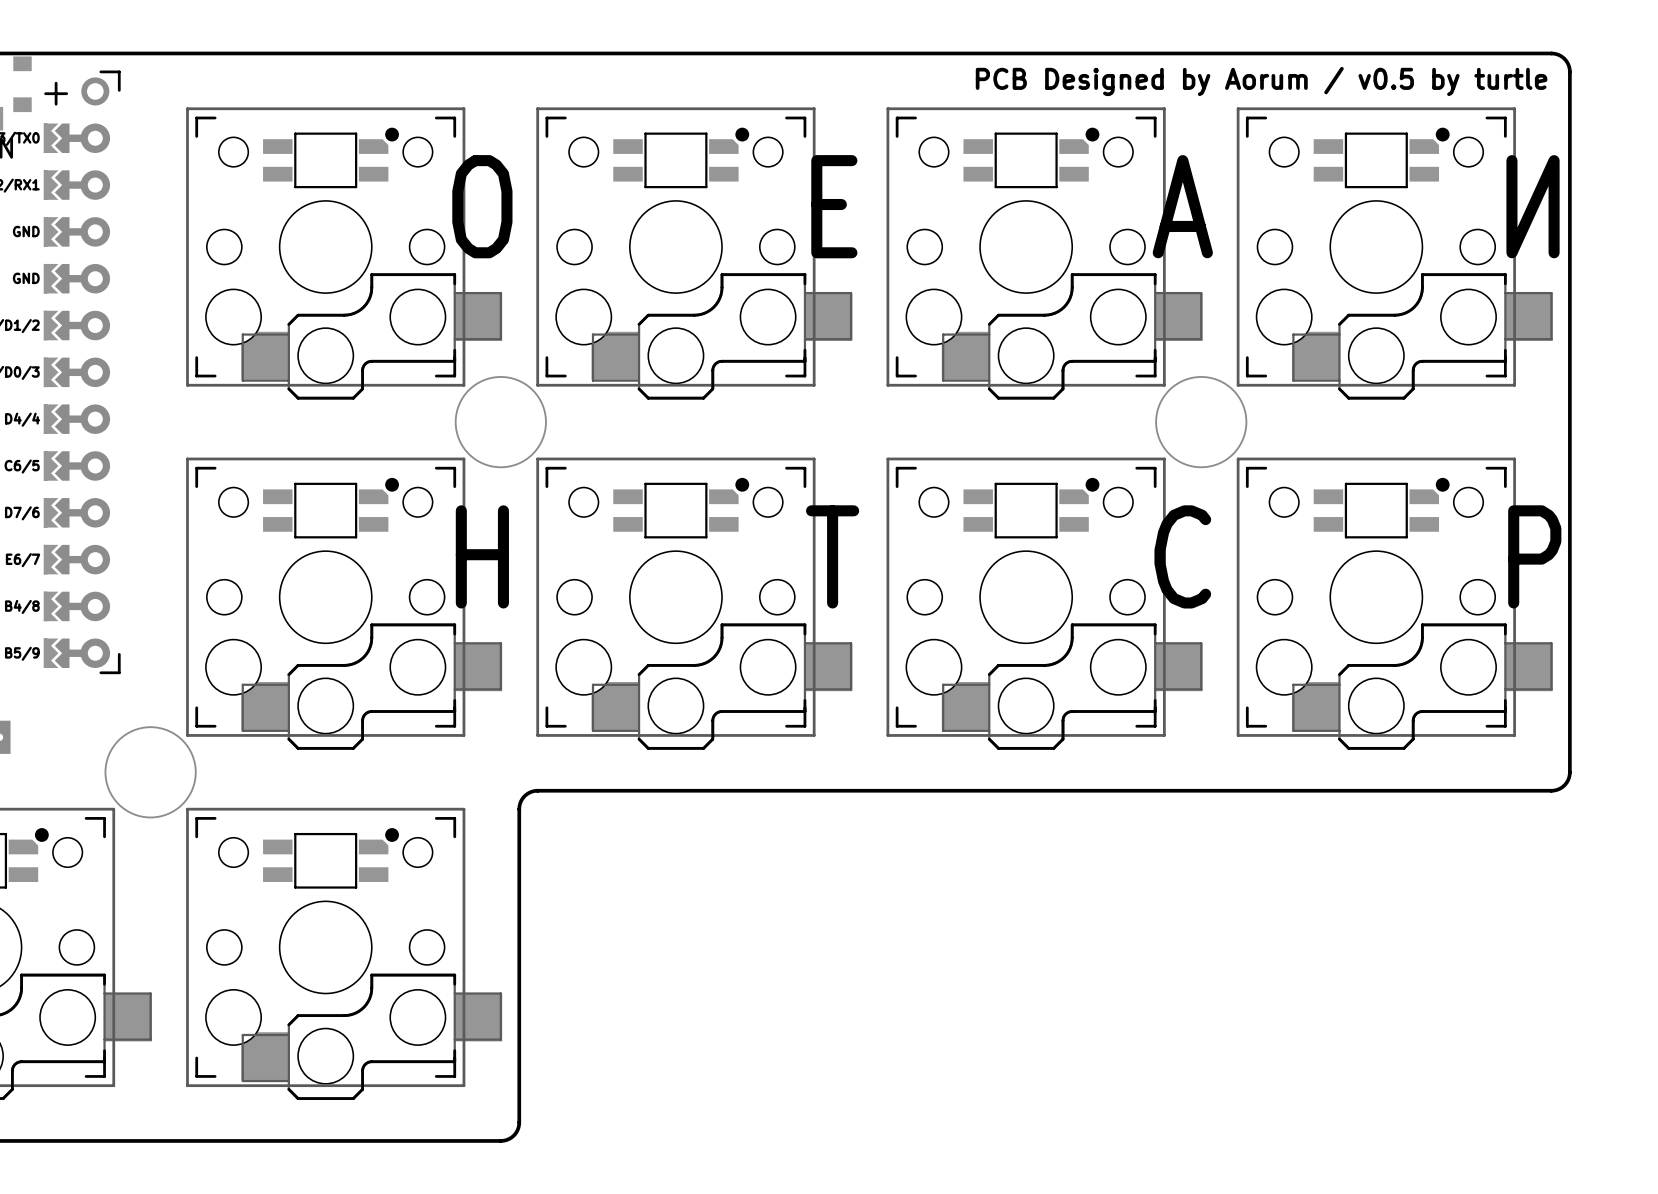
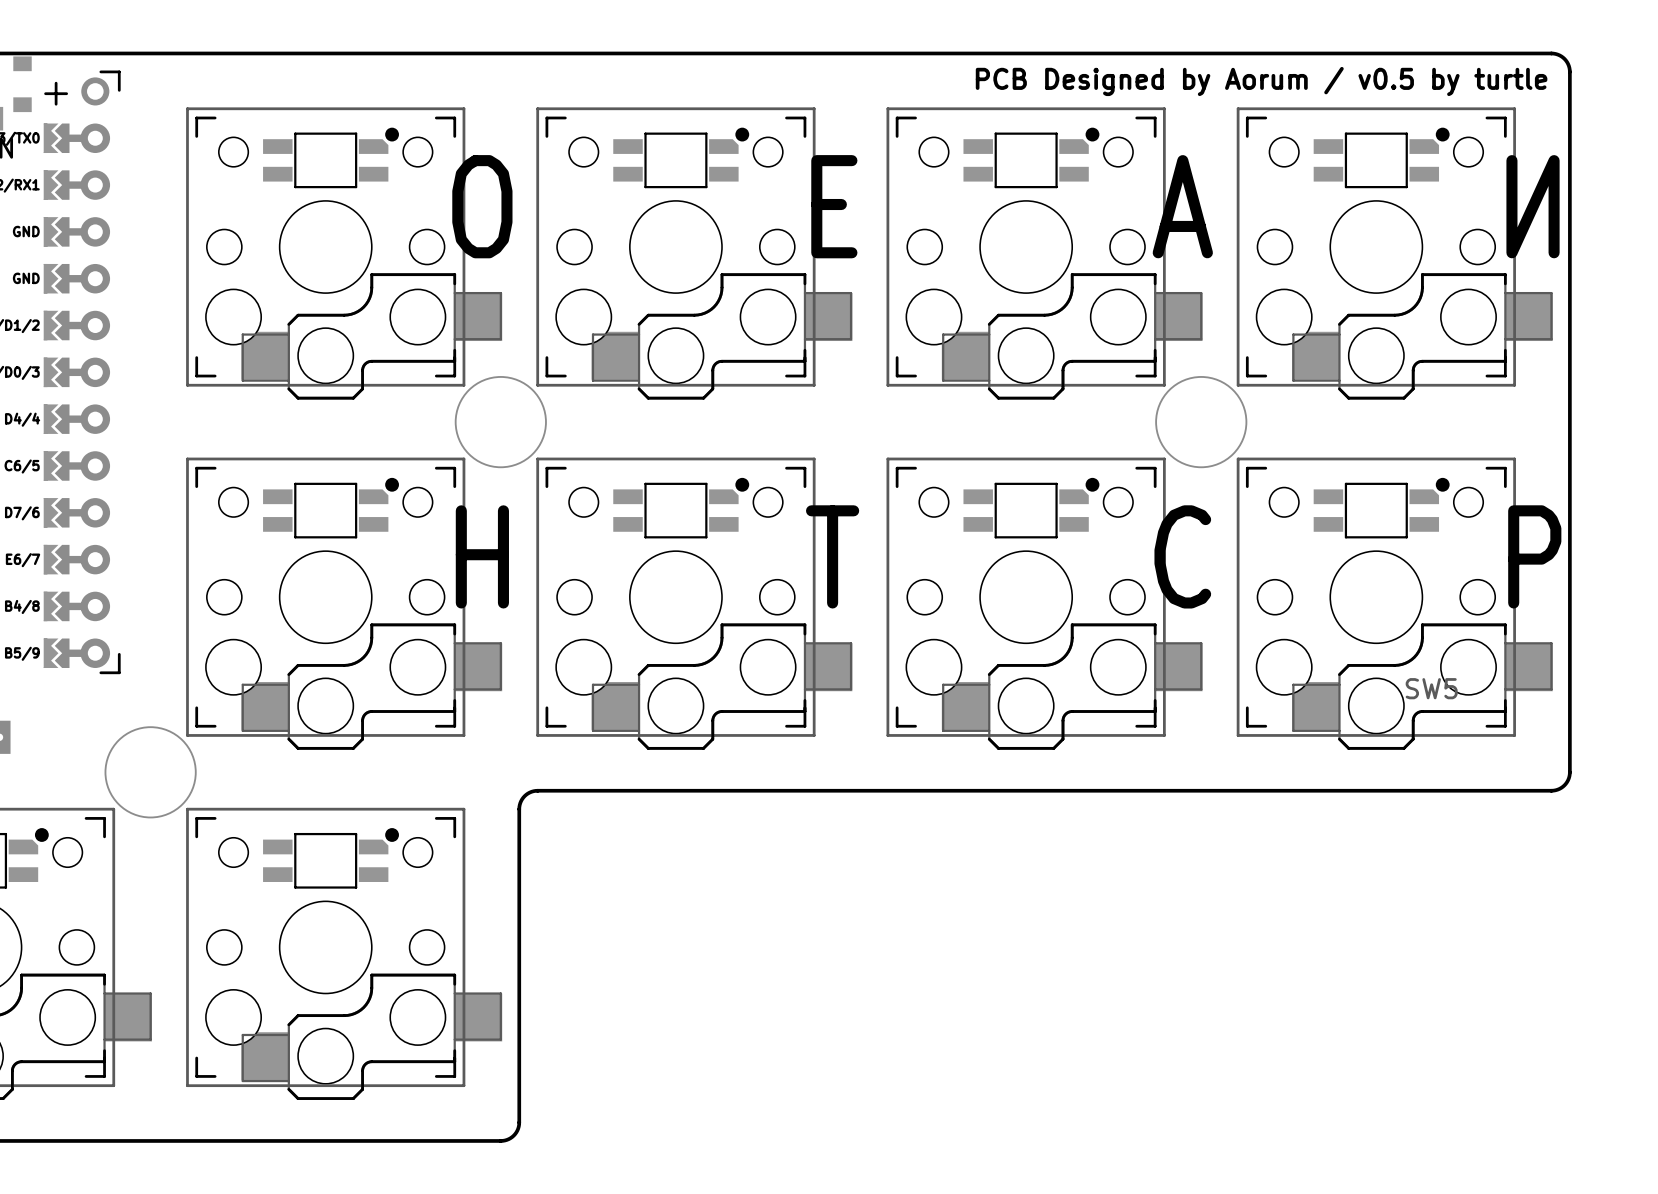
SW5 name: none -> SW5 (1431, 688)

